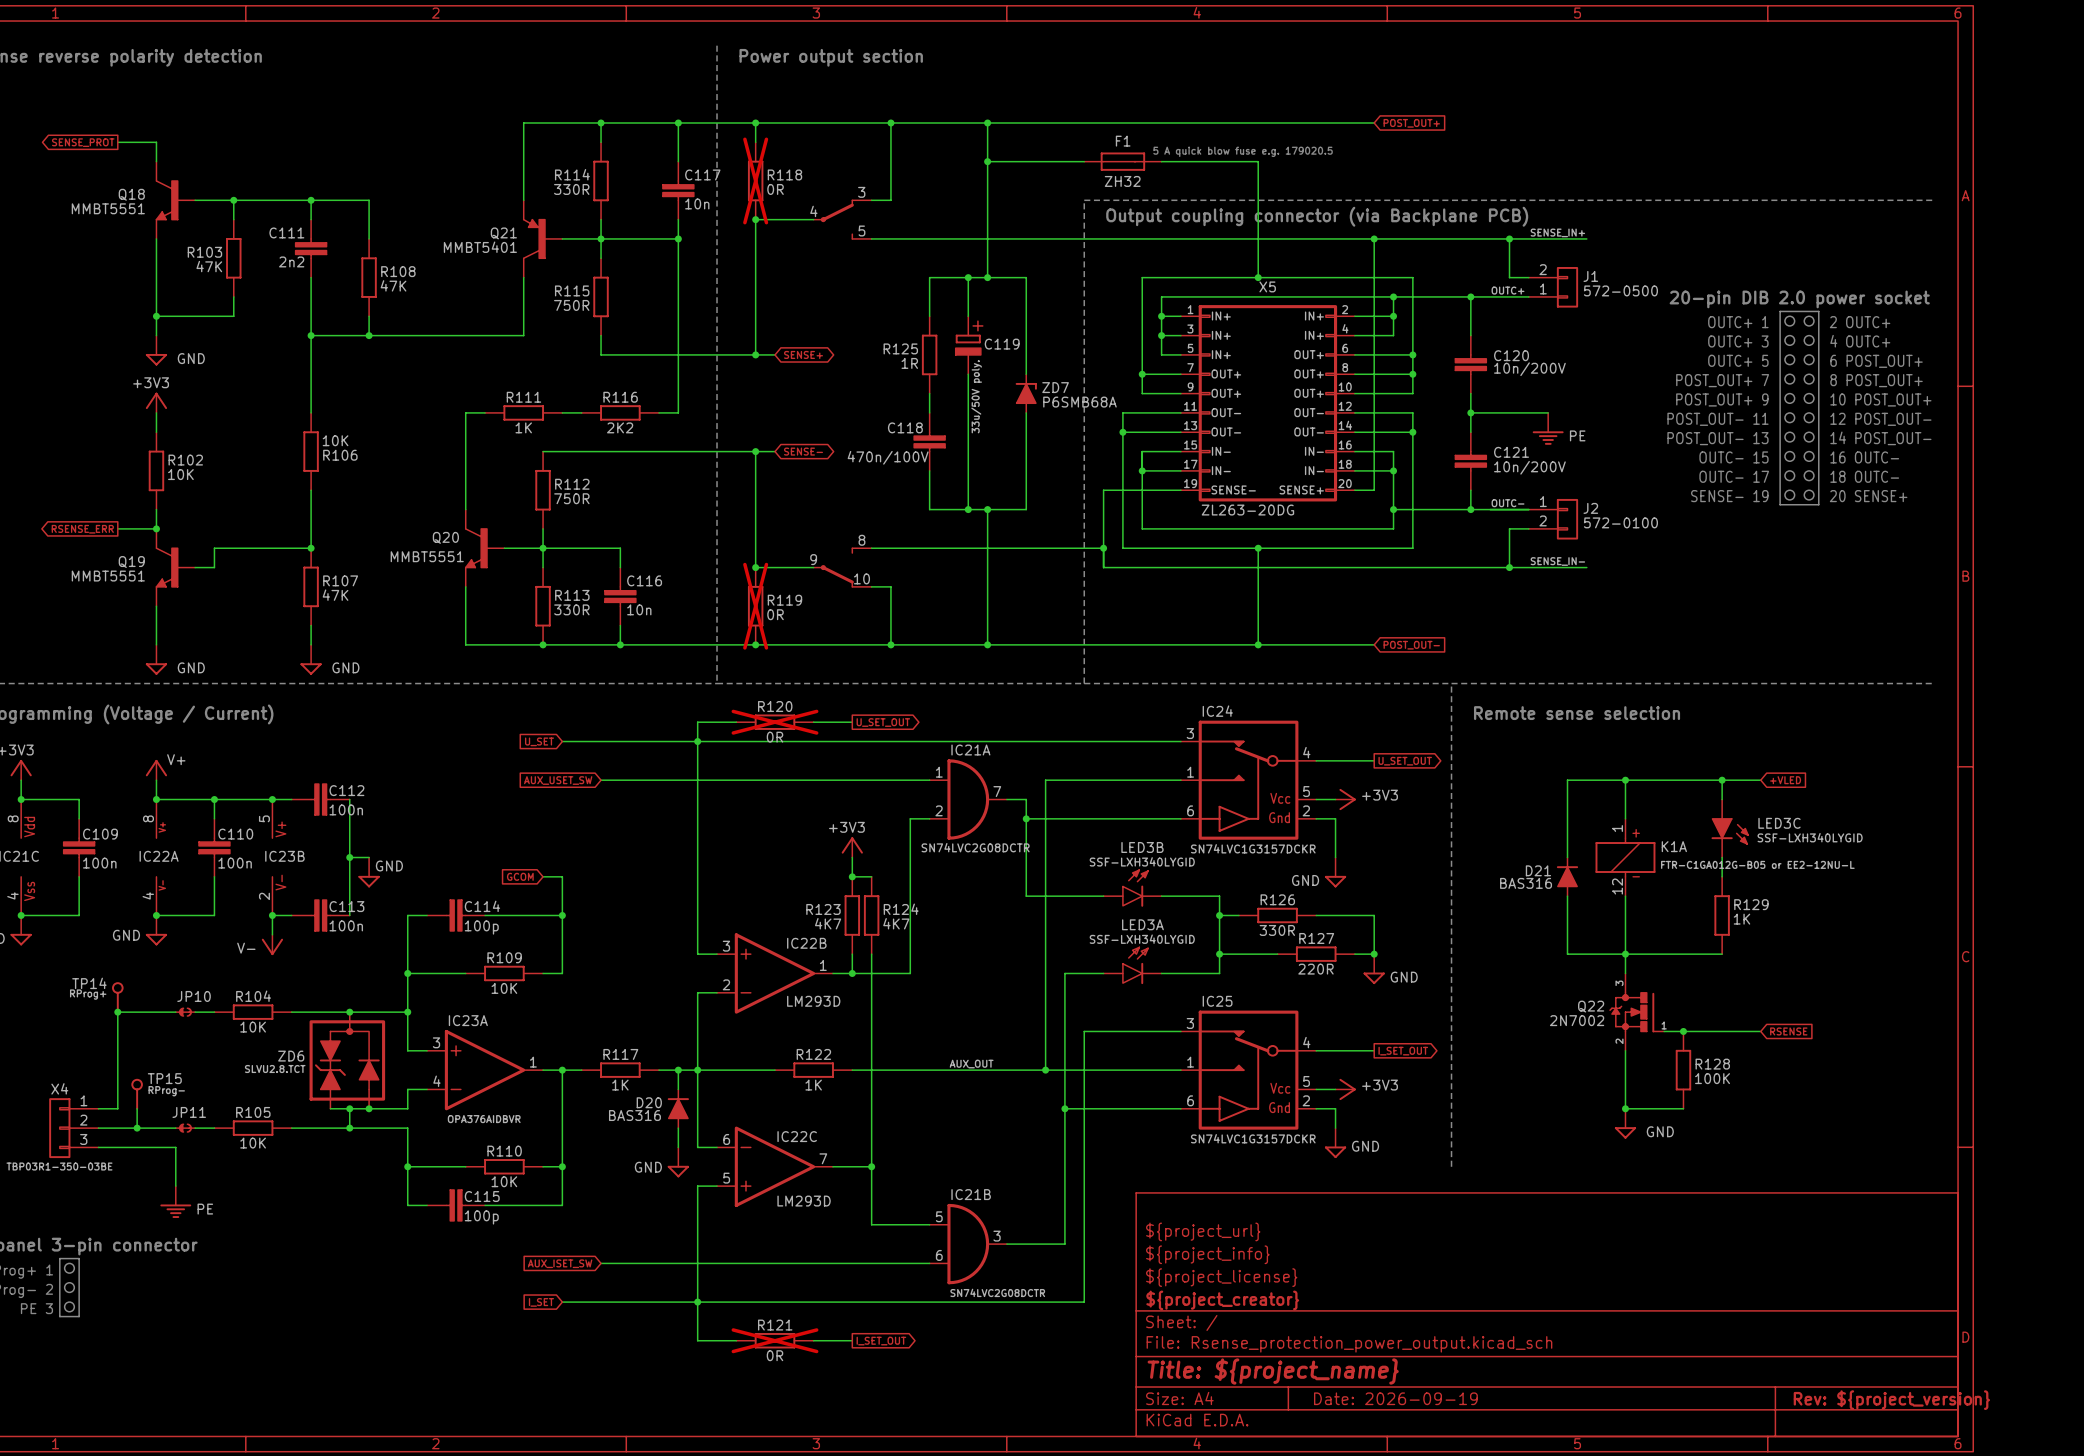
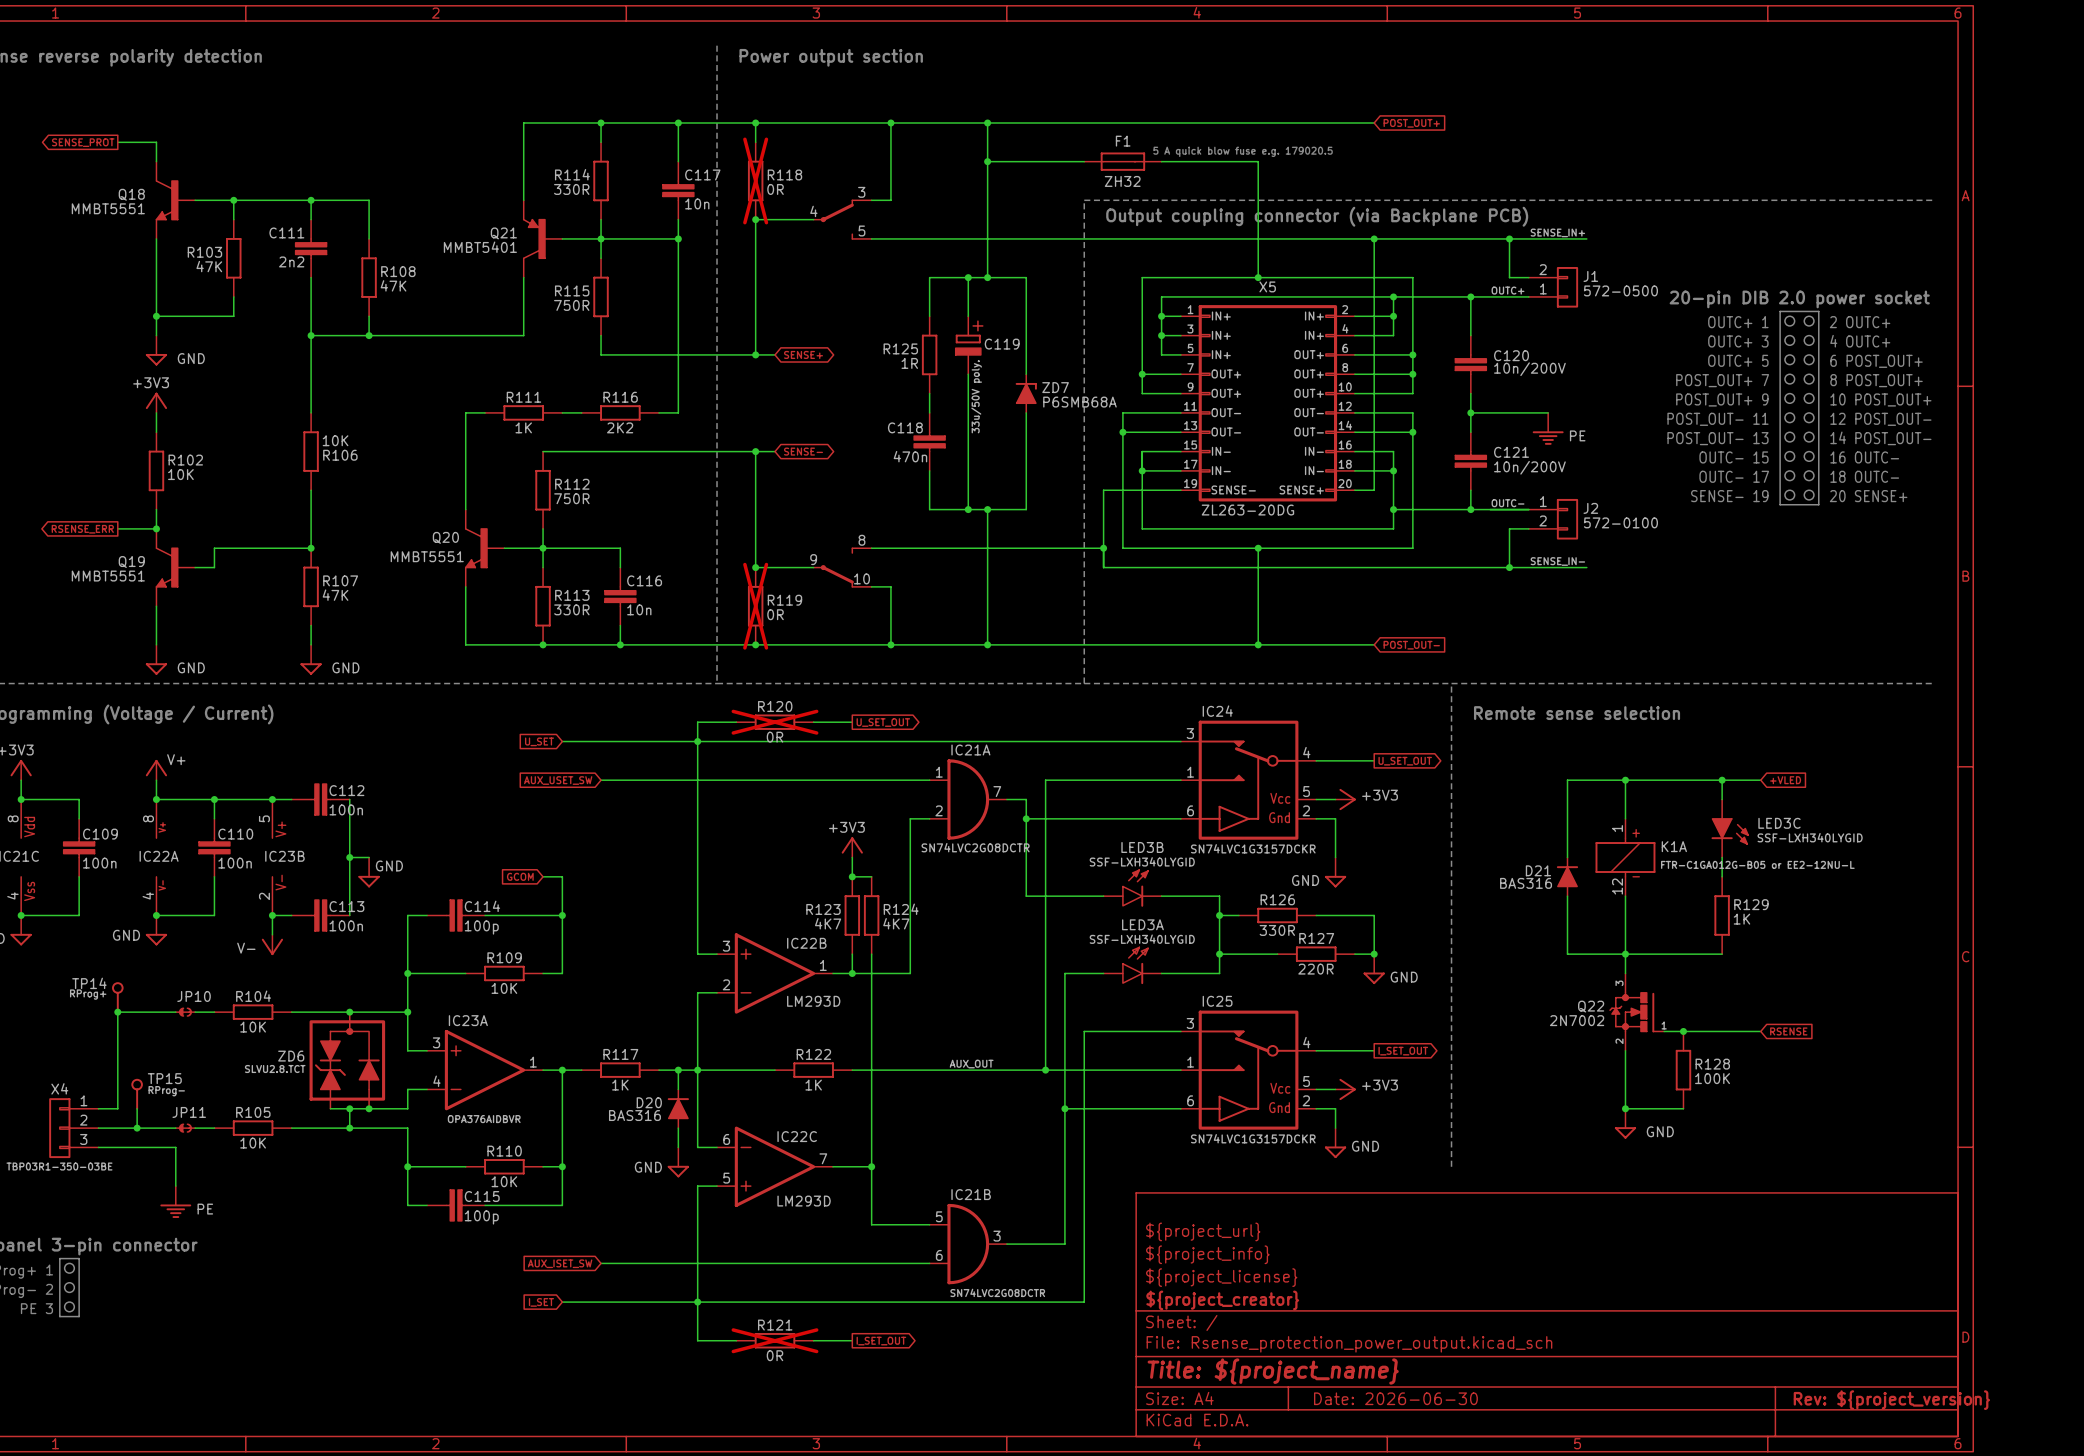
C118 value: 470n/100V (888, 457) -> 470n (910, 456)
title block: Date: 2026-09-19 (1395, 1398) -> Date: 2026-06-30 (1395, 1398)

